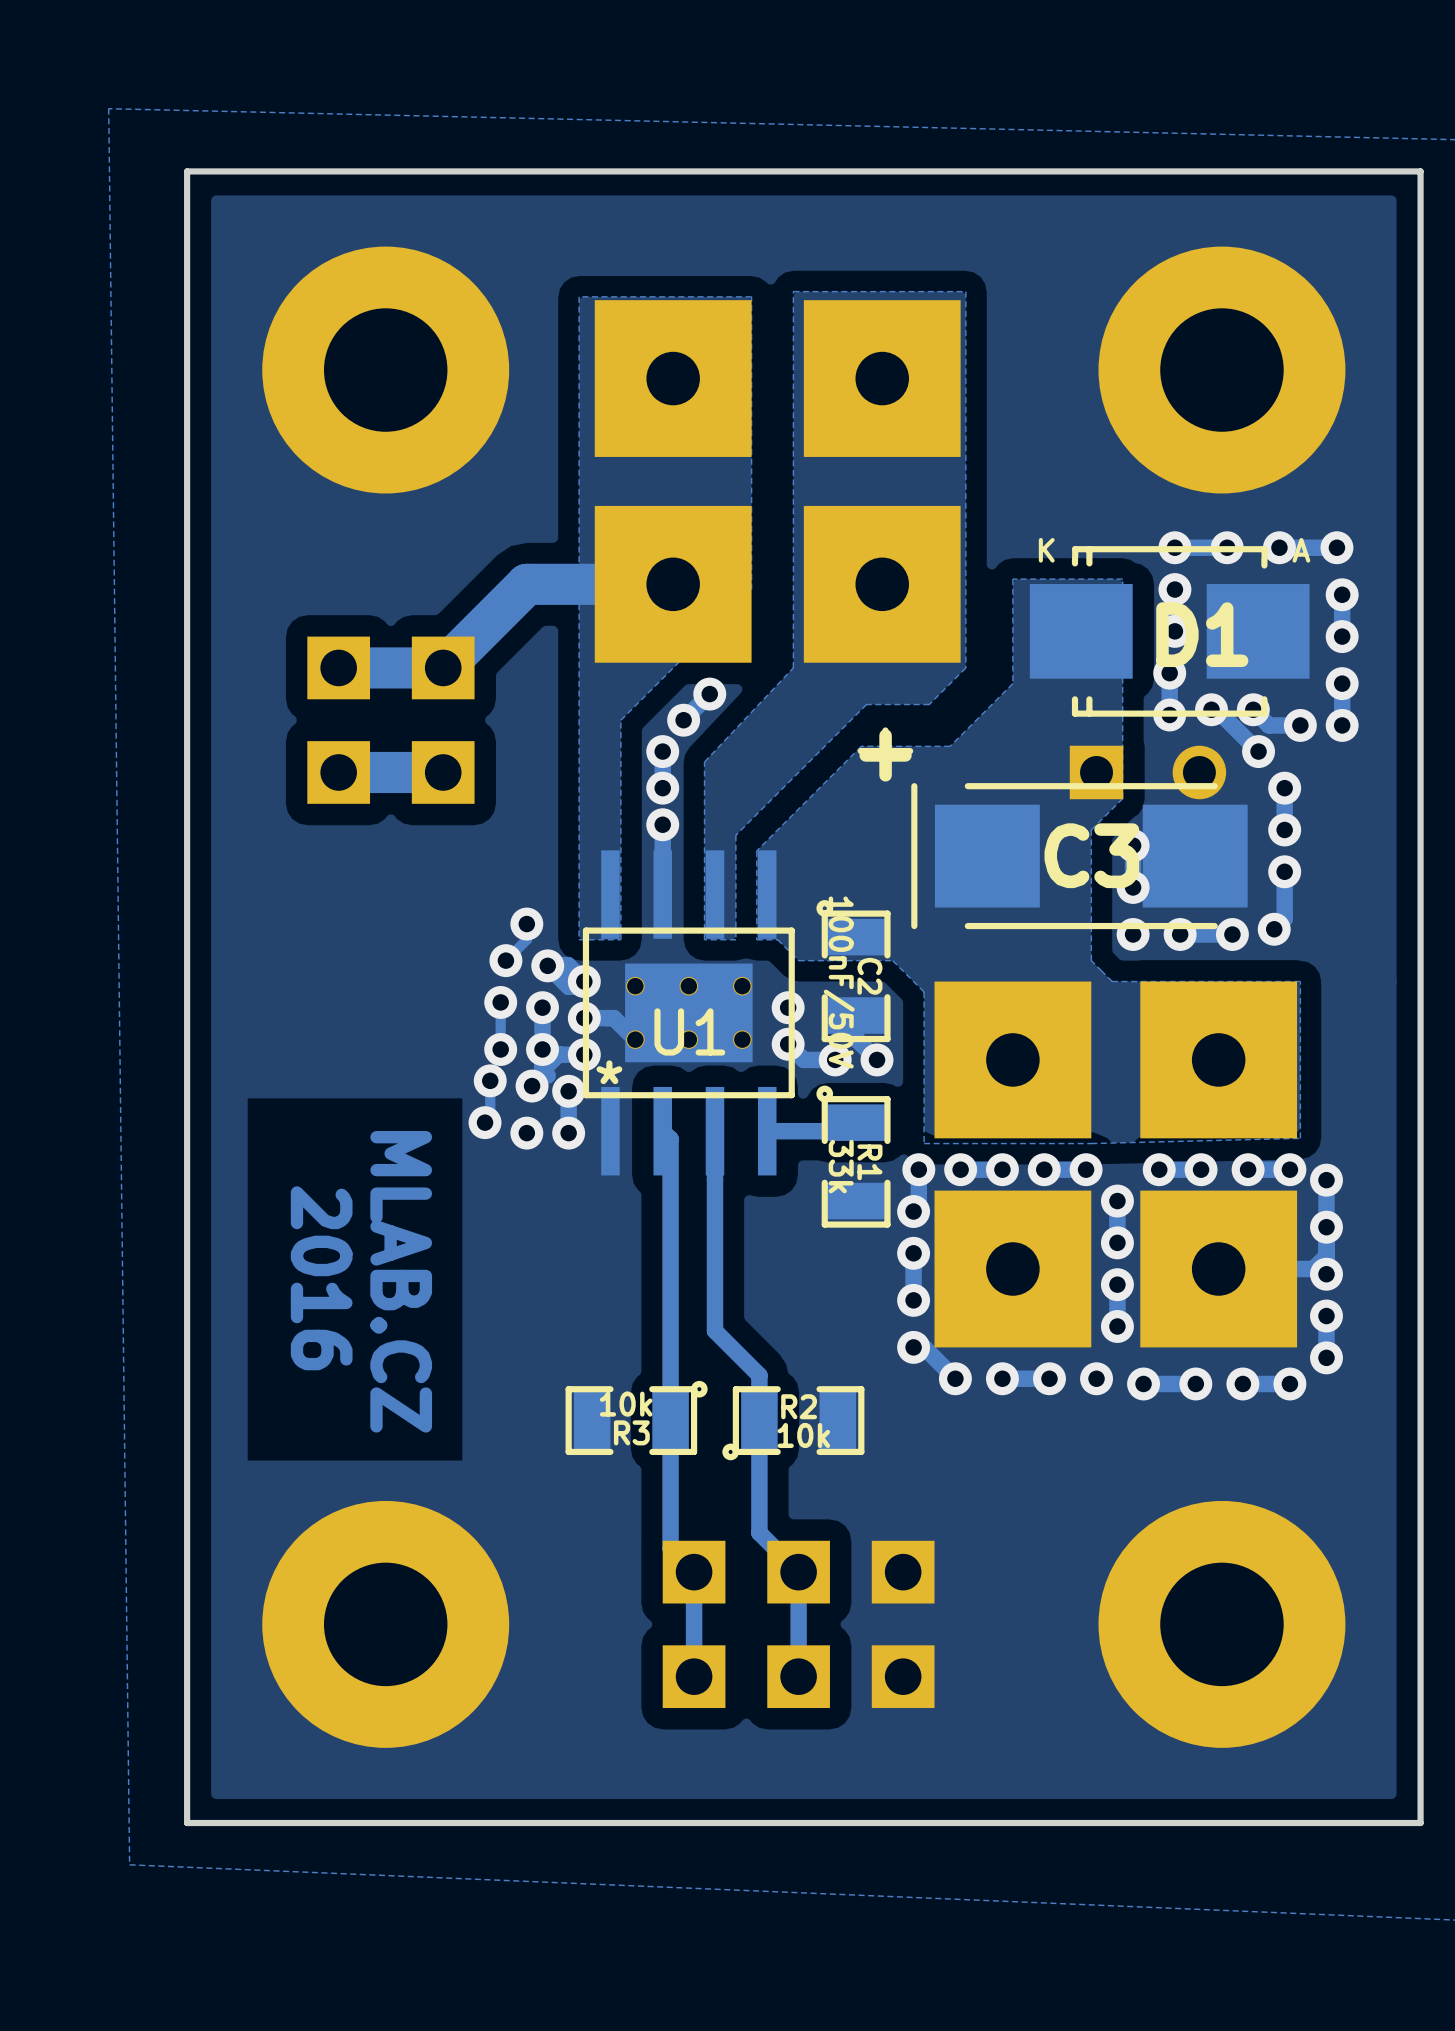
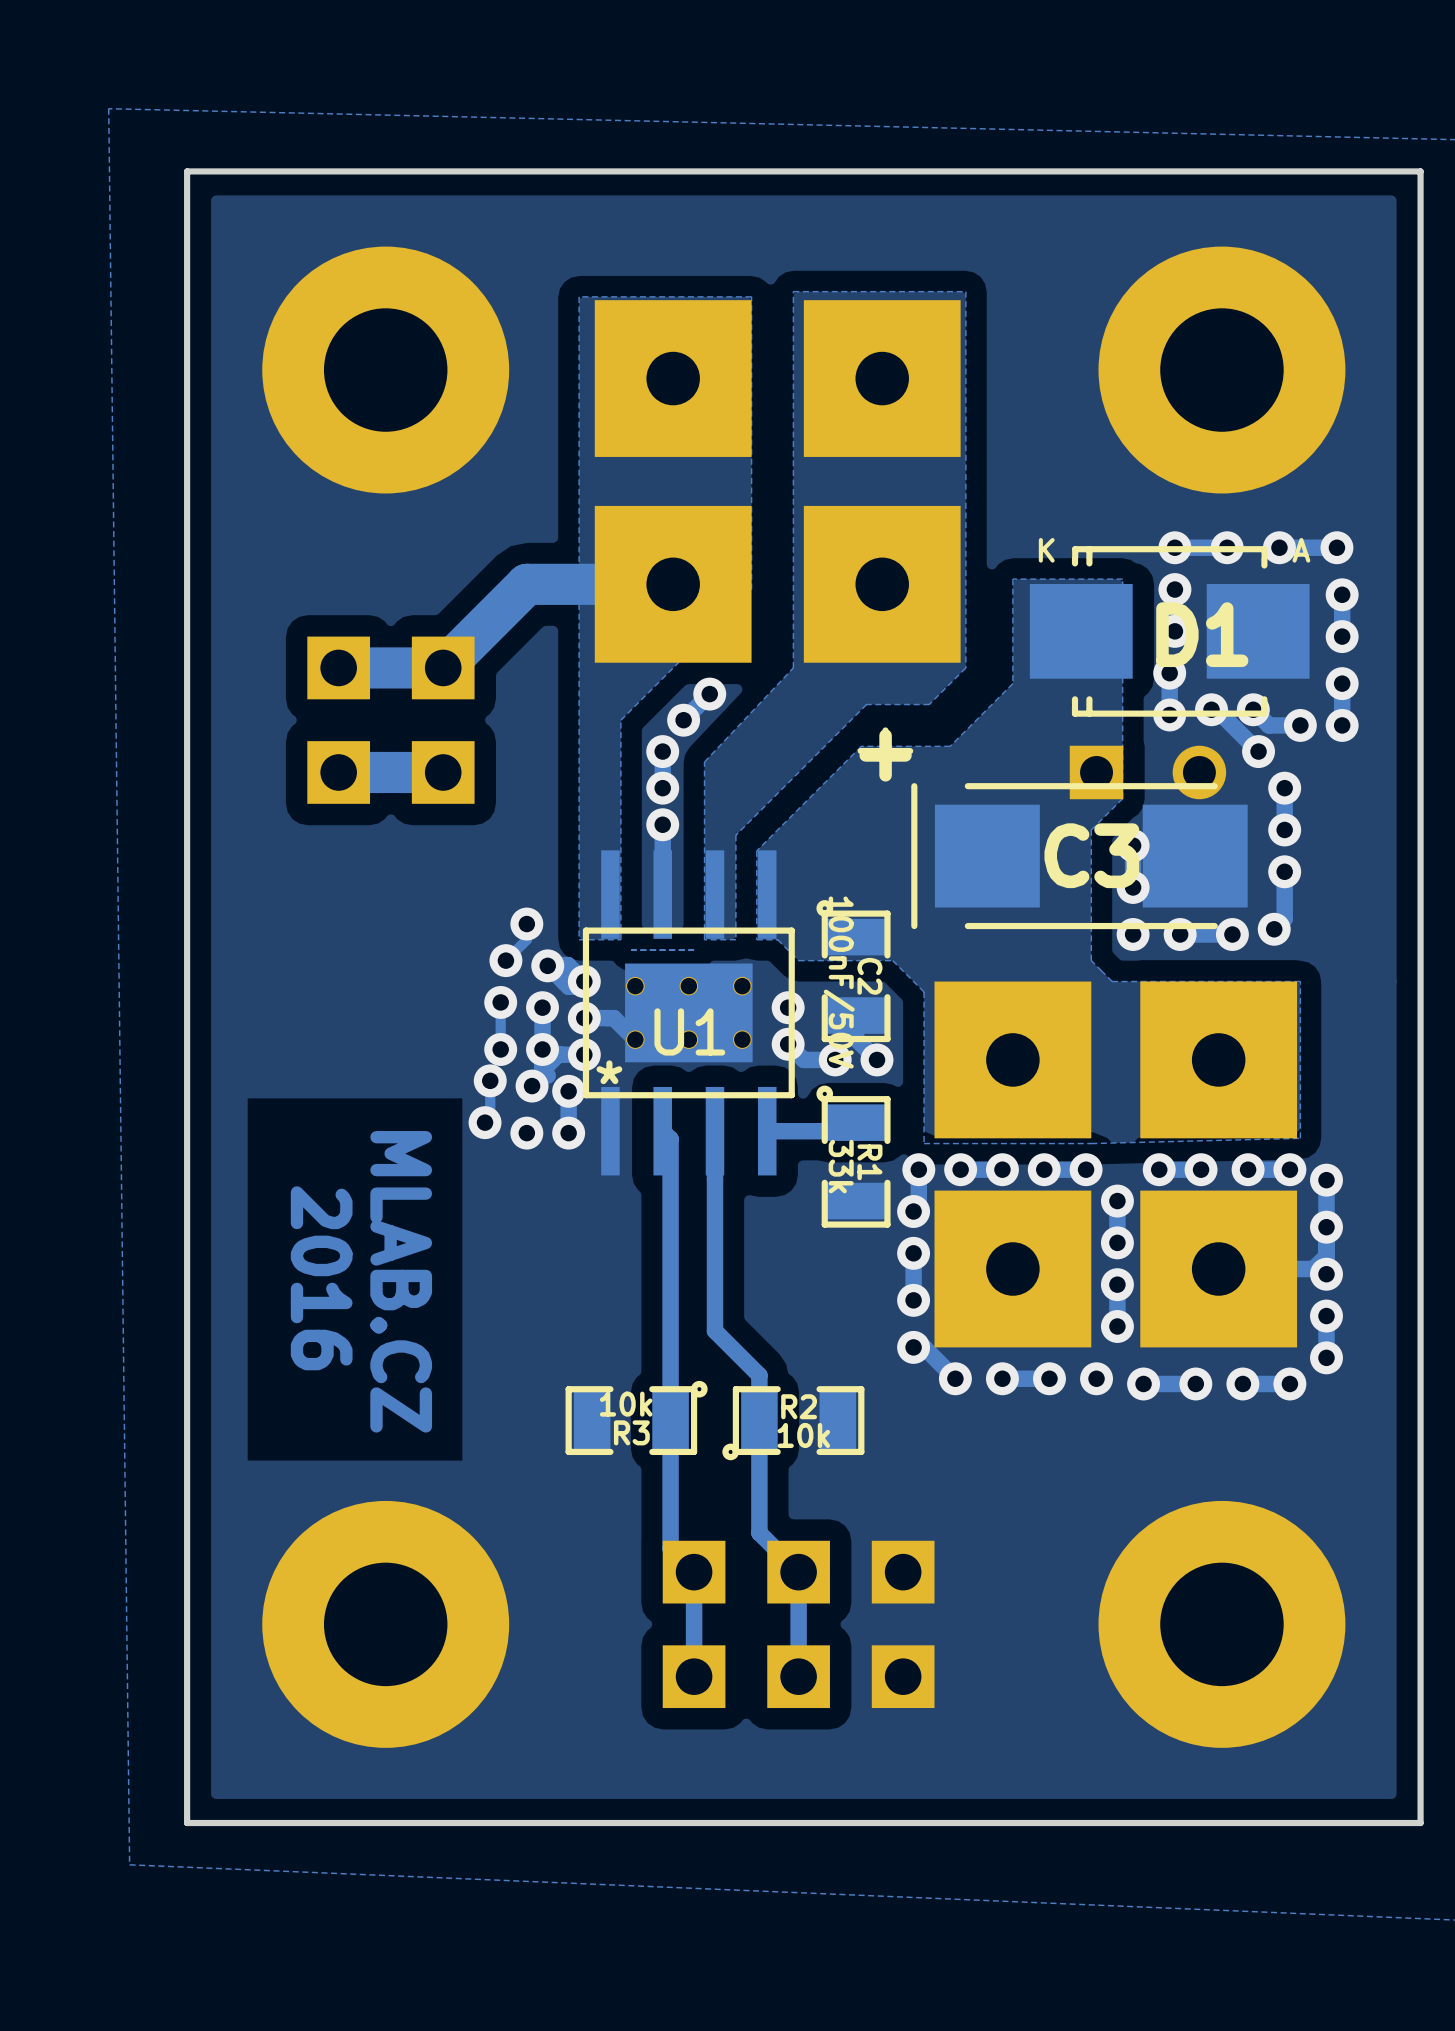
zone outline: none -> (694, 950) (631, 950)

